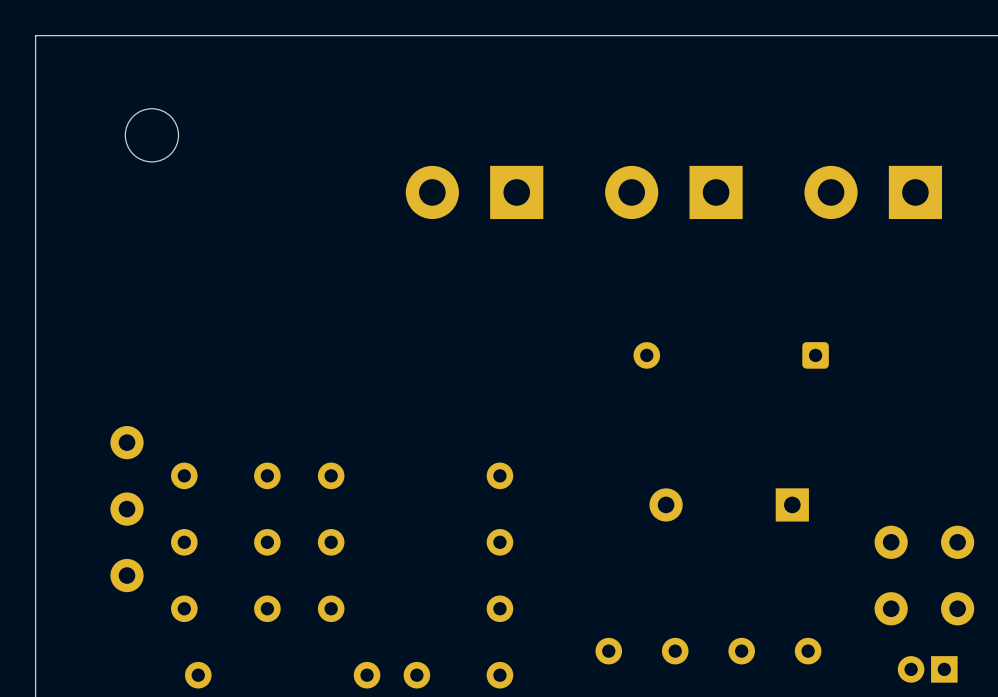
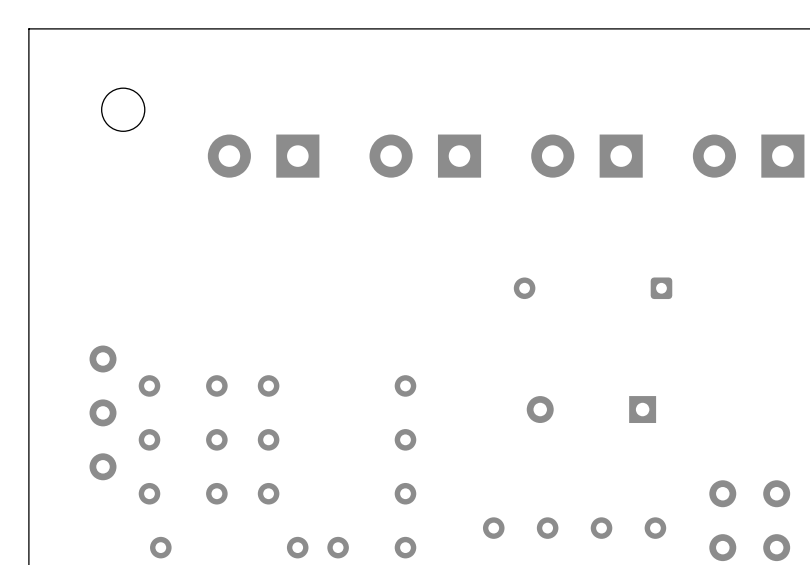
part: none -> (263, 156)
part position: (474, 192) -> (425, 156)
part position: (673, 192) -> (586, 156)
part position: (873, 192) -> (748, 156)
part: (891, 542) -> none
part: (957, 542) -> none
part: (927, 669) -> none
part: none -> (722, 547)
part: none -> (776, 547)

